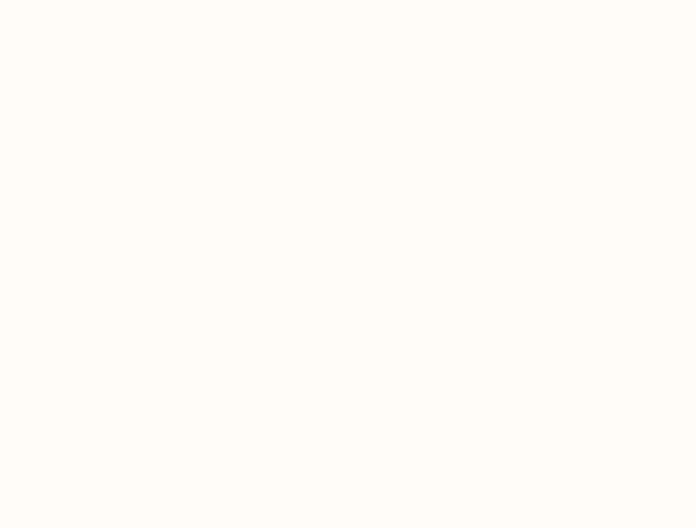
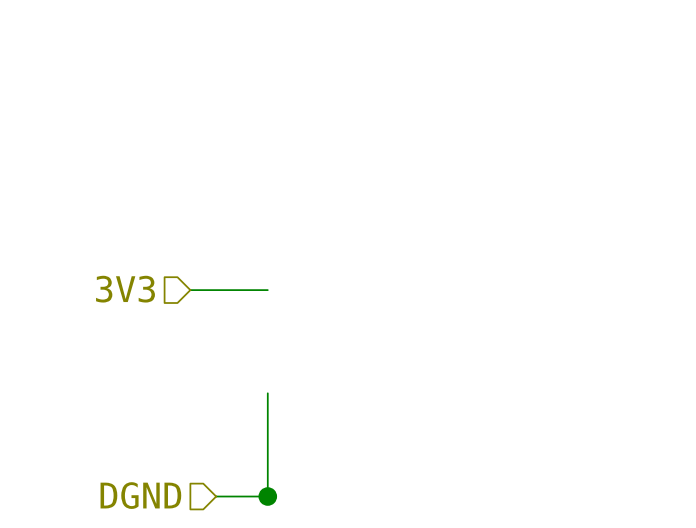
hierarchical label: none -> 3V3 (125, 289)
wire: none -> (190, 290) (267, 290)
wire: none -> (267, 393) (267, 496) (216, 496)
hierarchical label: none -> DGND (140, 495)
junction: none -> (267, 496)

